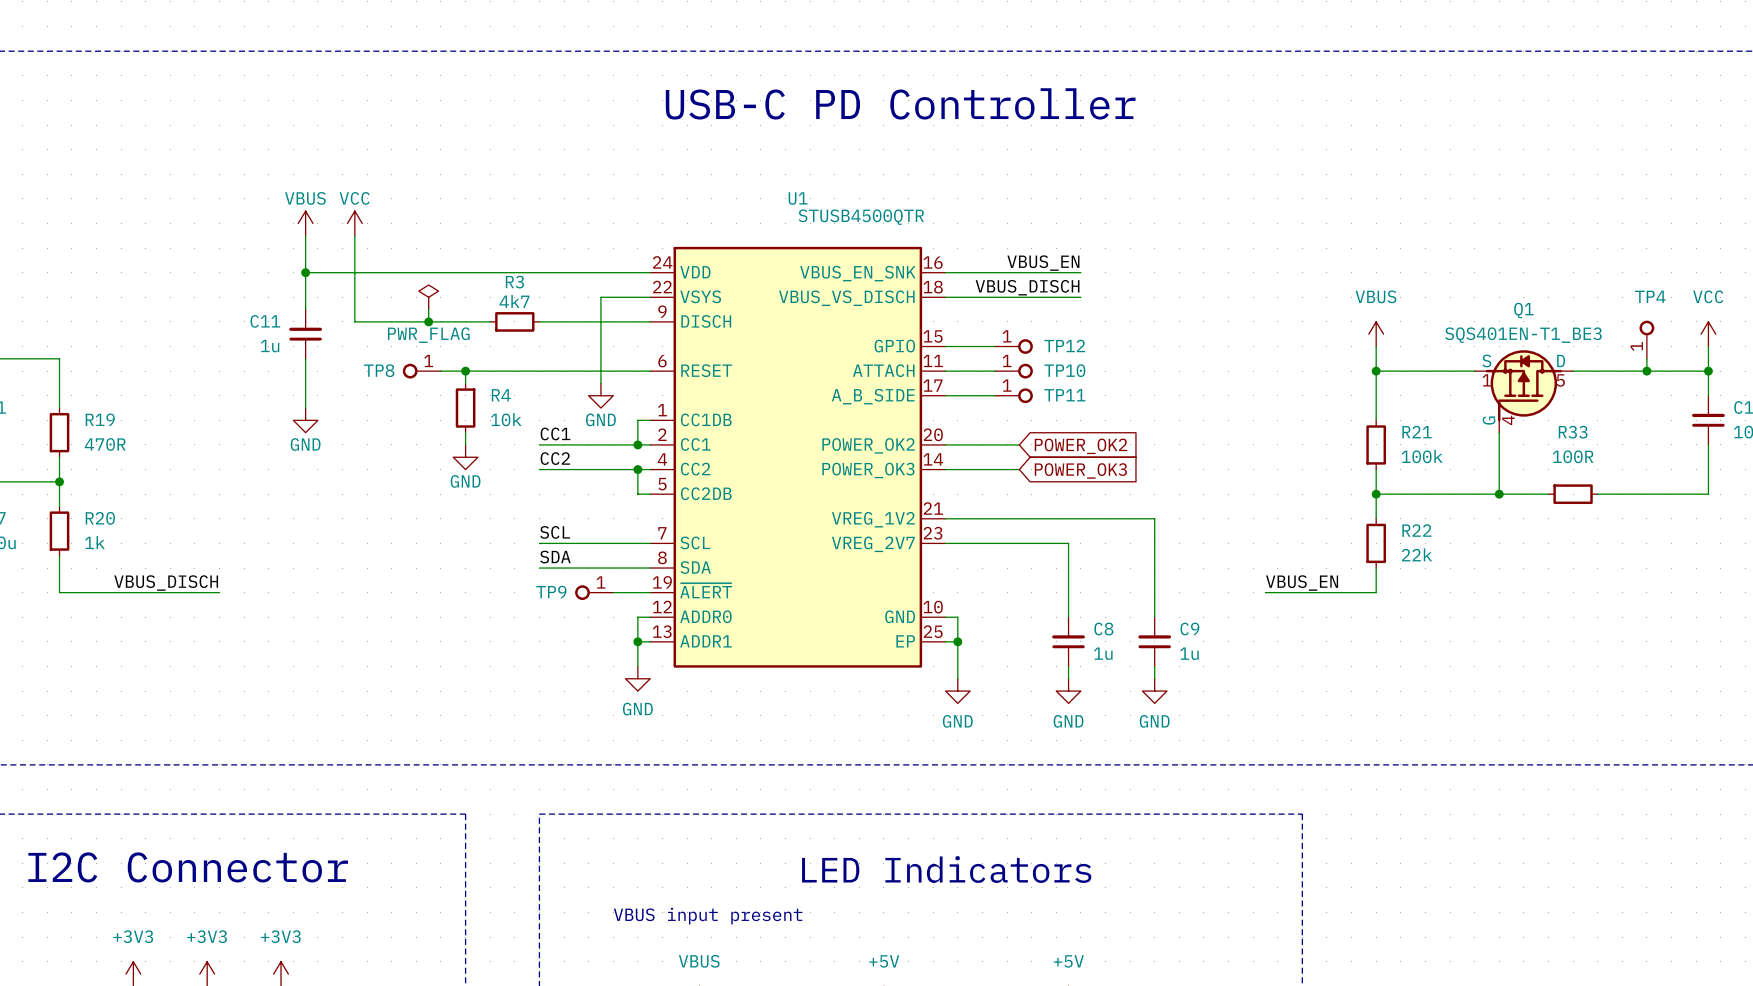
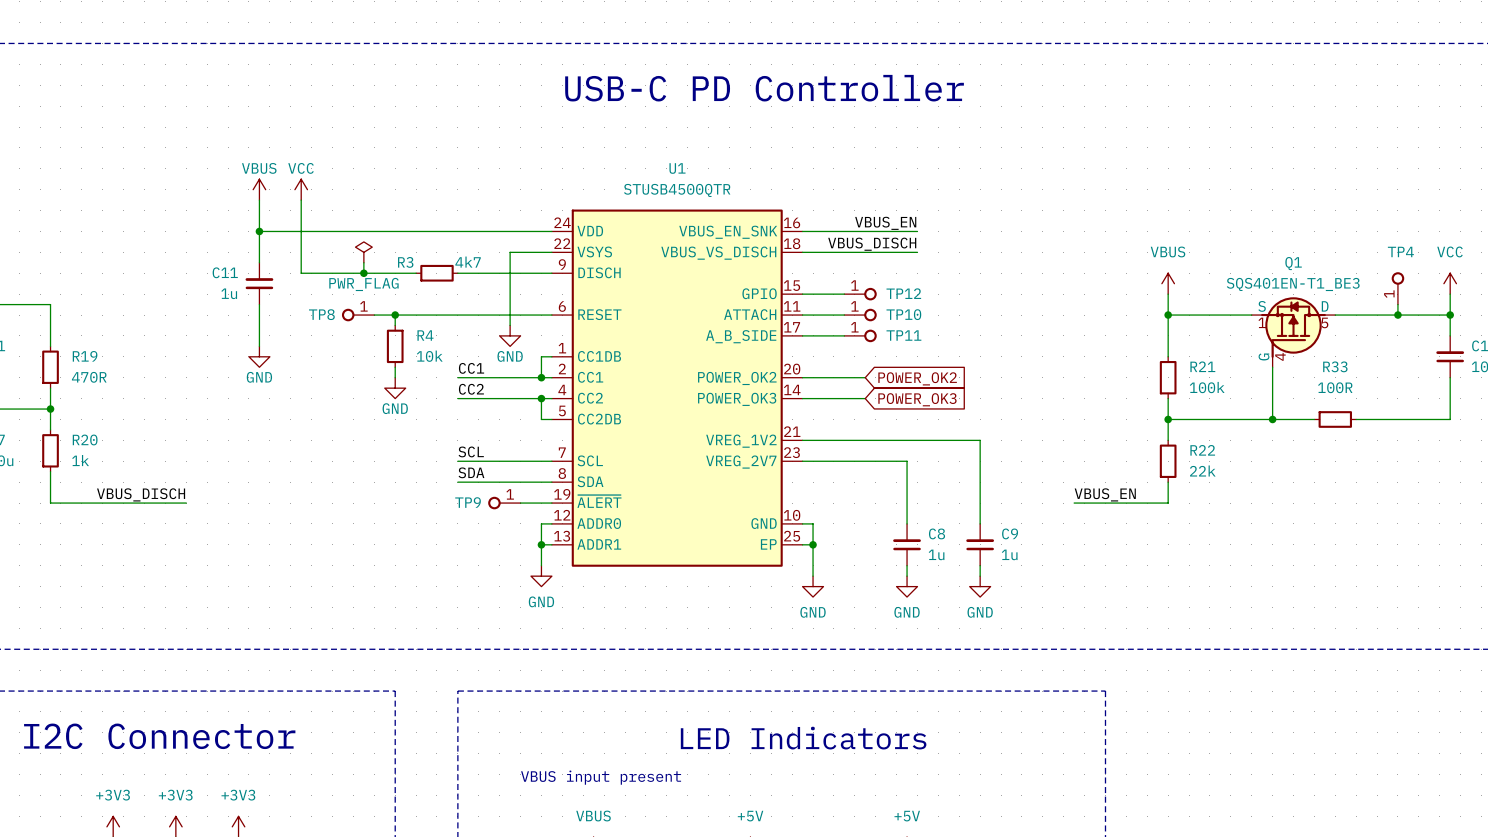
U1 text position: STUSB4500QTR (861, 217) -> STUSB4500QTR (677, 190)
R3 name position: R3 (514, 282) -> R3 (405, 262)
R3 text position: 4k7 (514, 301) -> 4k7 (468, 262)

